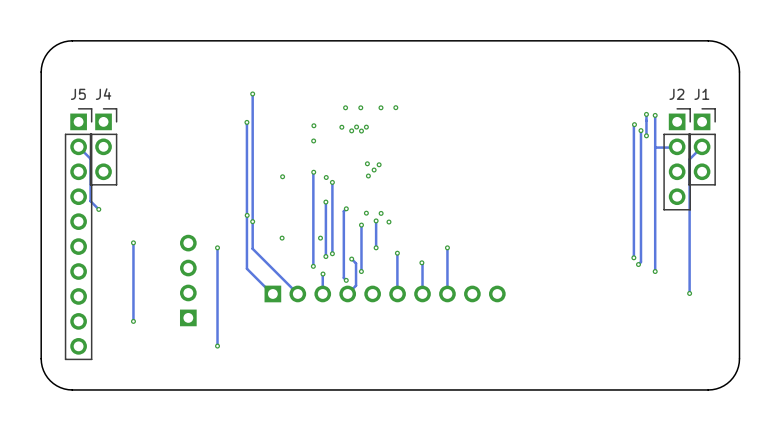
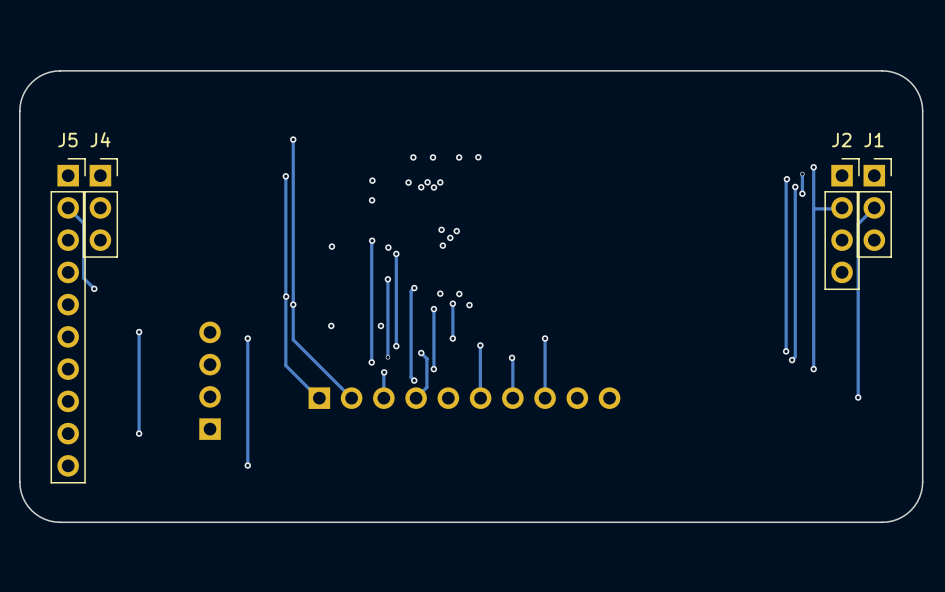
track: (646, 114) (646, 120) -> none
via: (646, 114) -> none
via: none -> (802, 174)
track: none -> (387, 349) (387, 357)
via: (325, 256) -> none
via: none -> (387, 357)

